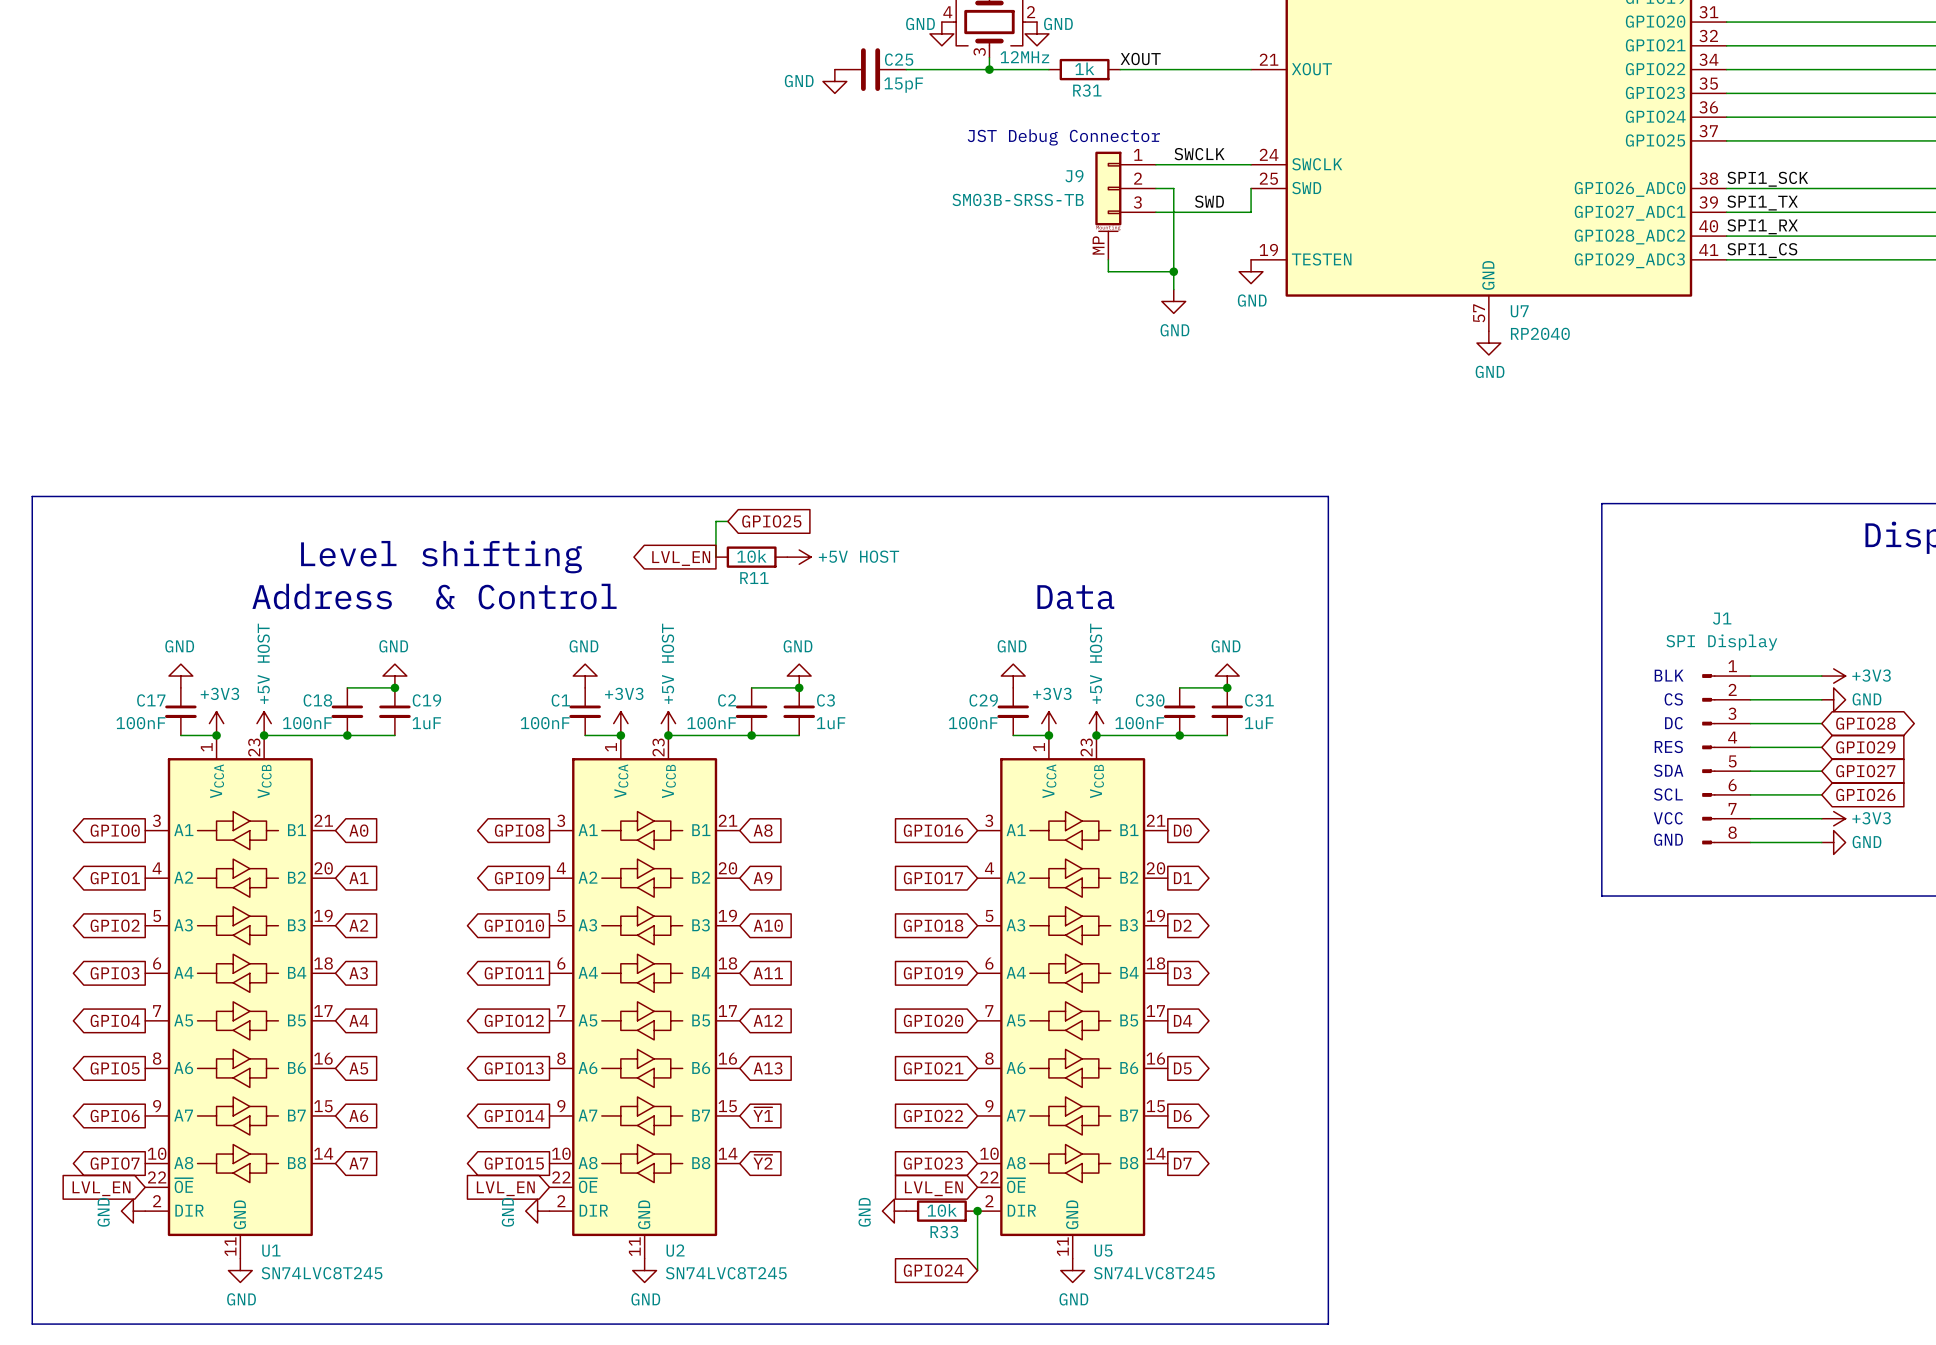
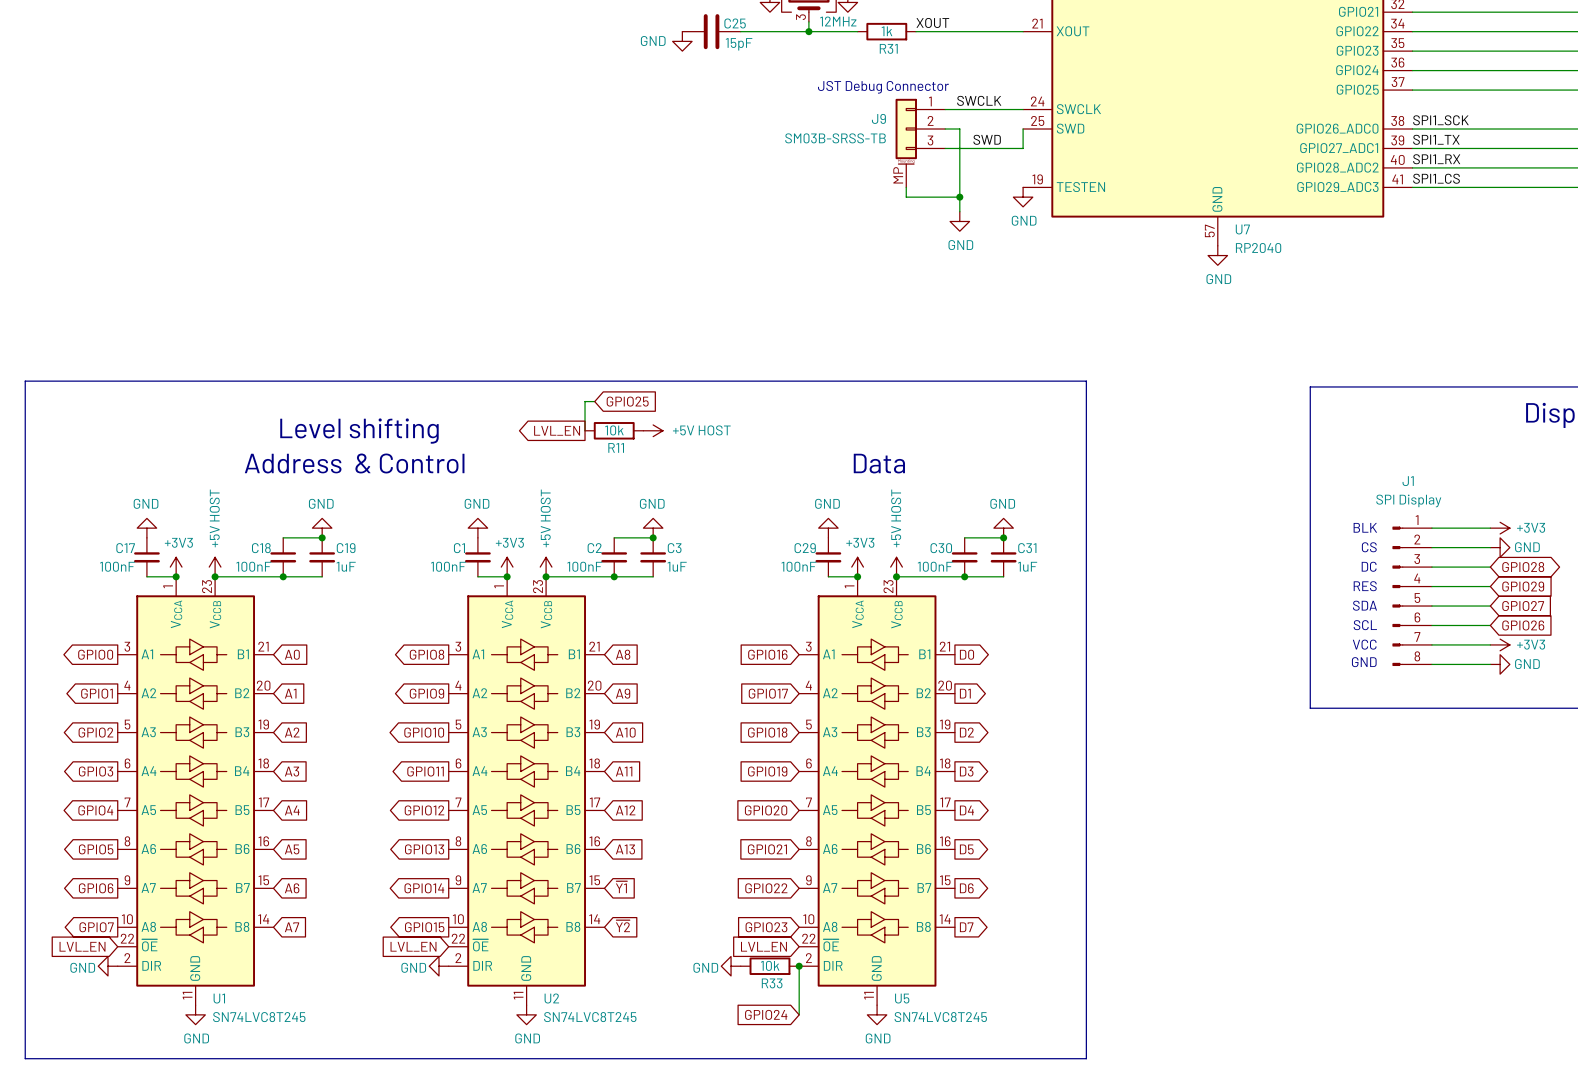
power symbol text rotation: 0° (103, 1212) -> 90° clockwise (82, 967)
power symbol text rotation: 0° (507, 1212) -> 90° clockwise (413, 967)
power symbol text rotation: 0° (864, 1212) -> 90° clockwise (705, 967)

